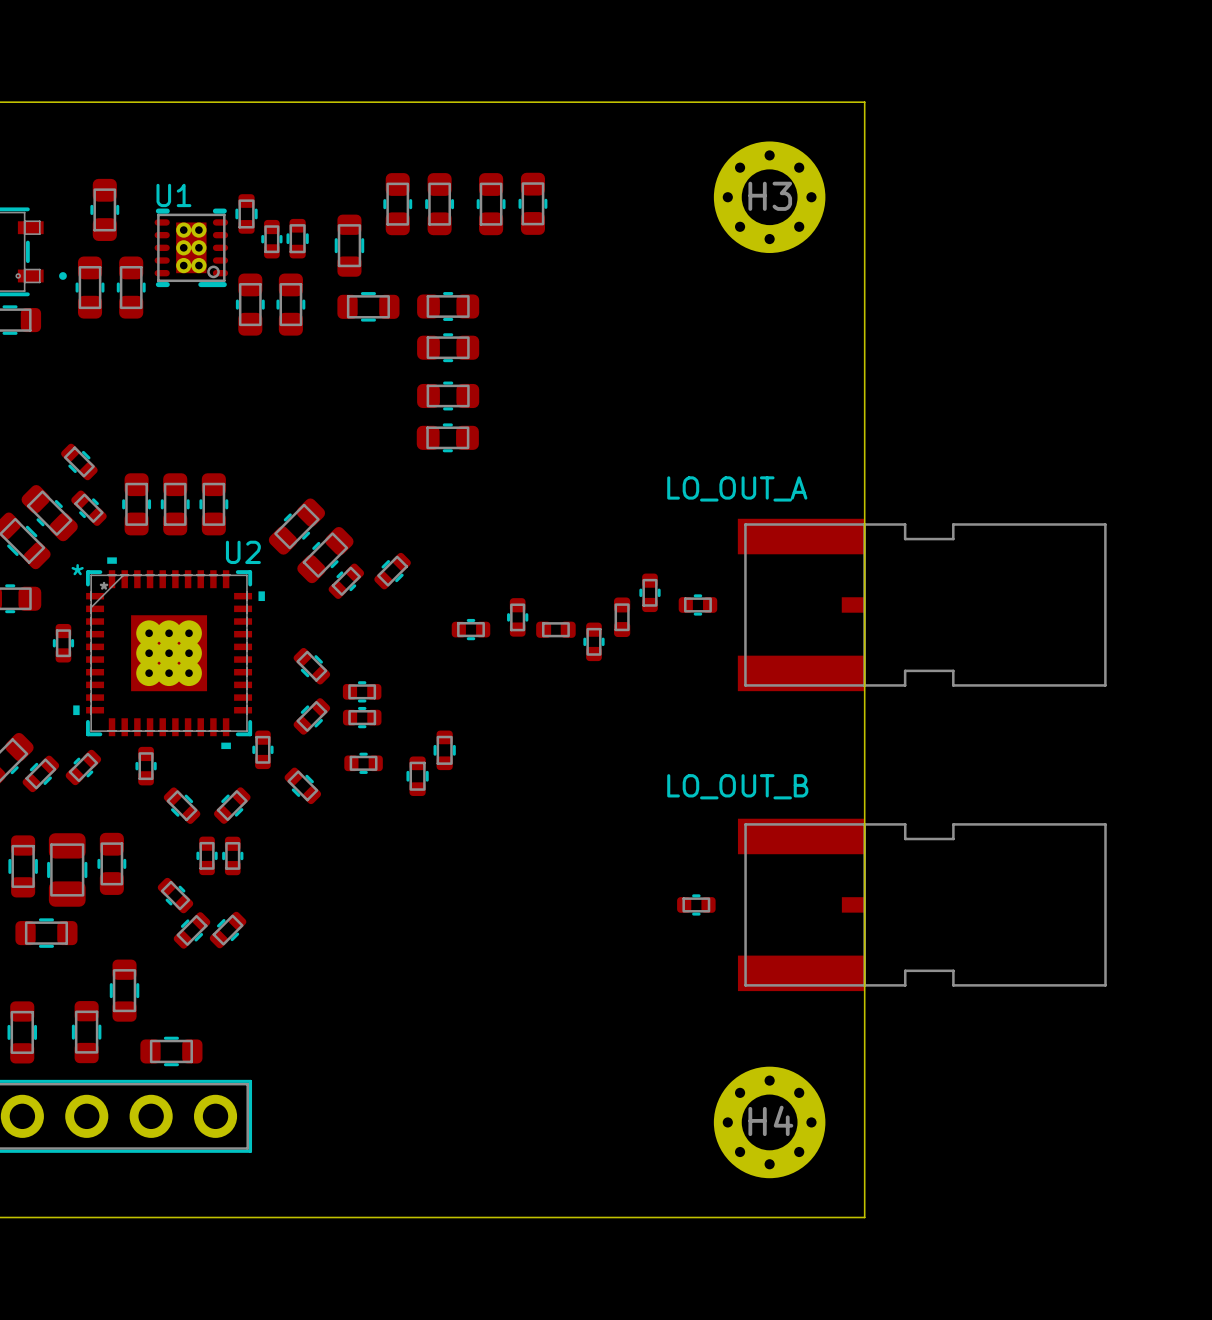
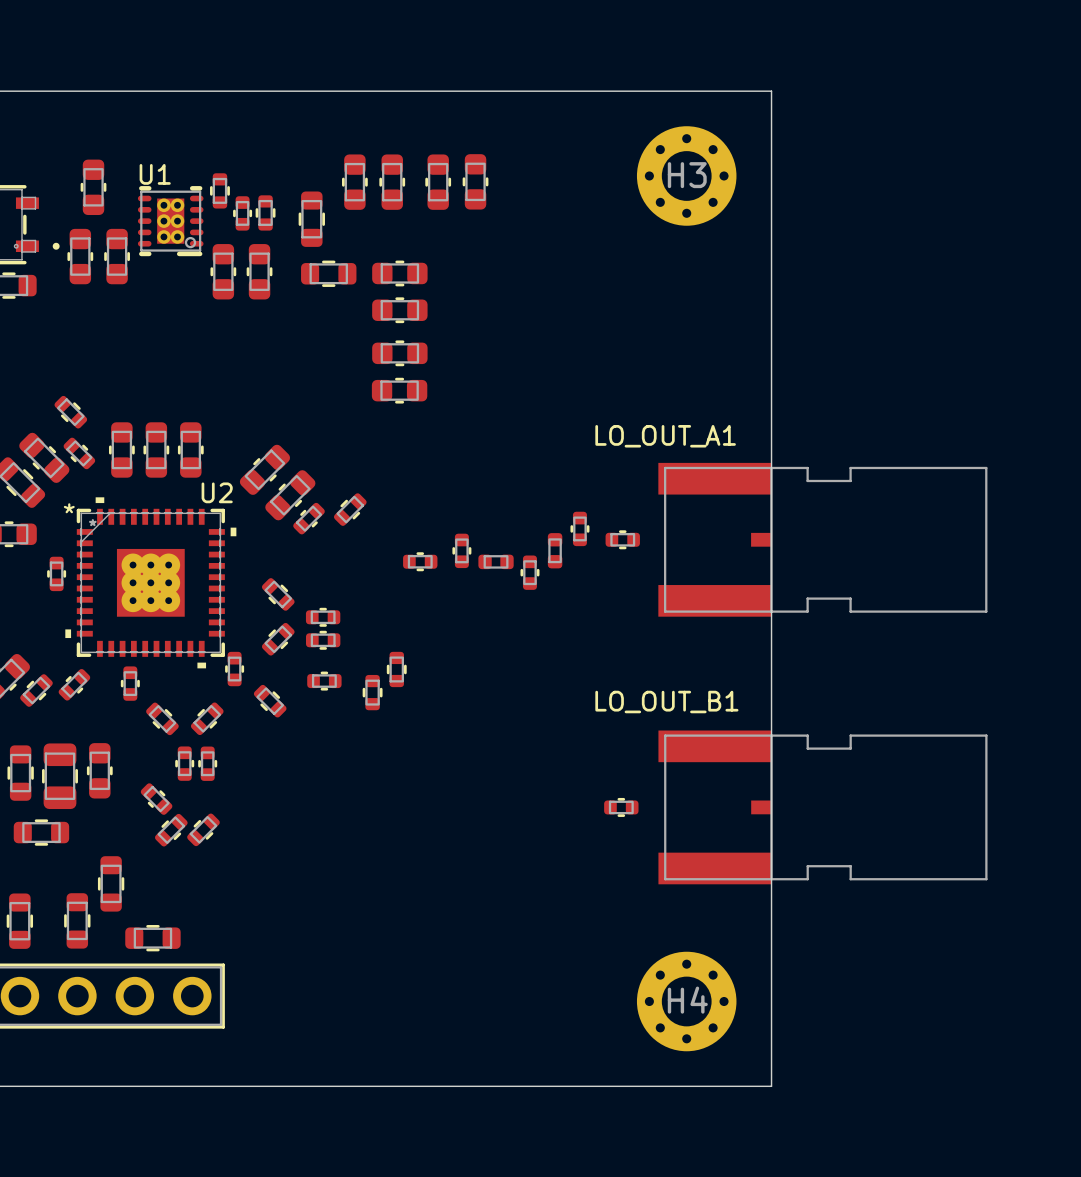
LO_OUT_A name: LO_OUT_A (737, 488) -> LO_OUT_A1 (665, 436)
LO_OUT_B name: LO_OUT_B (737, 786) -> LO_OUT_B1 (666, 702)

